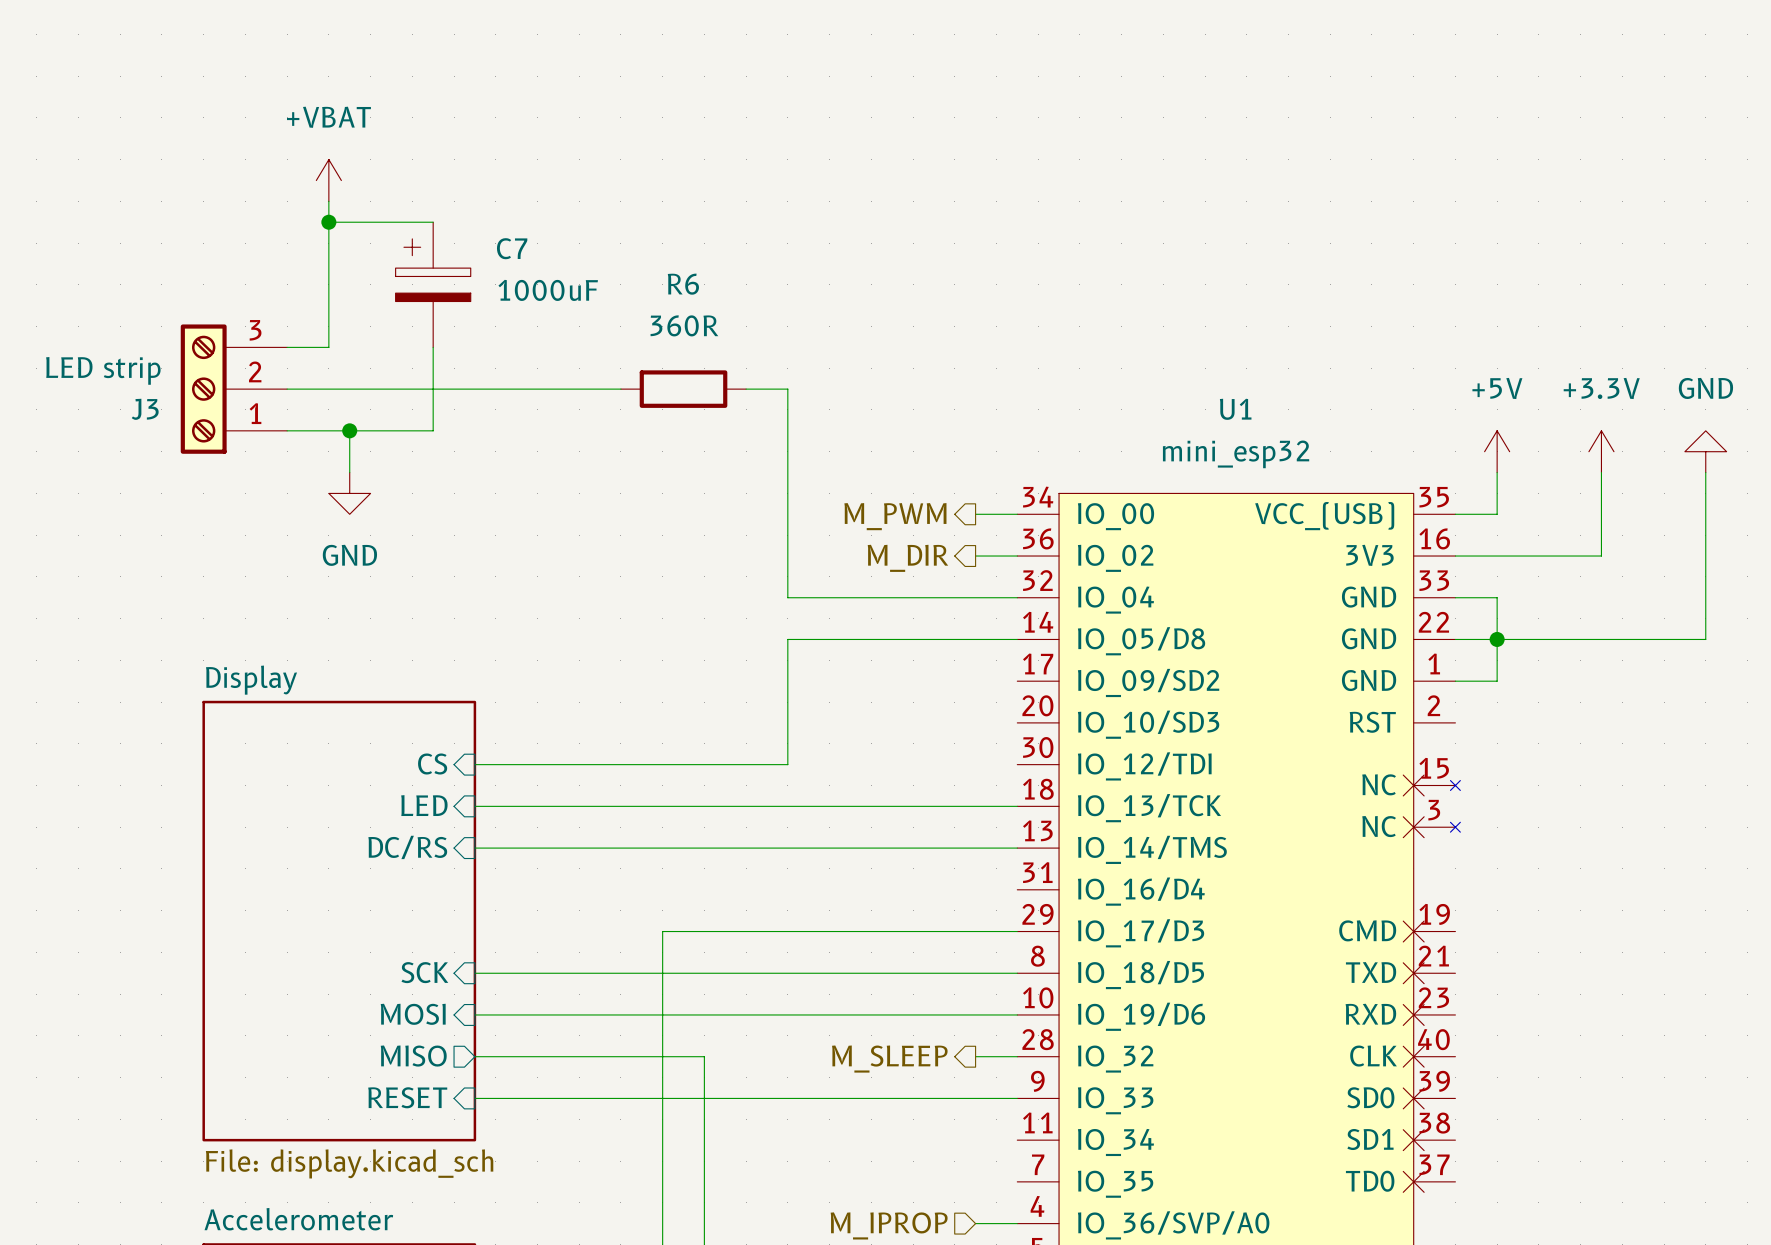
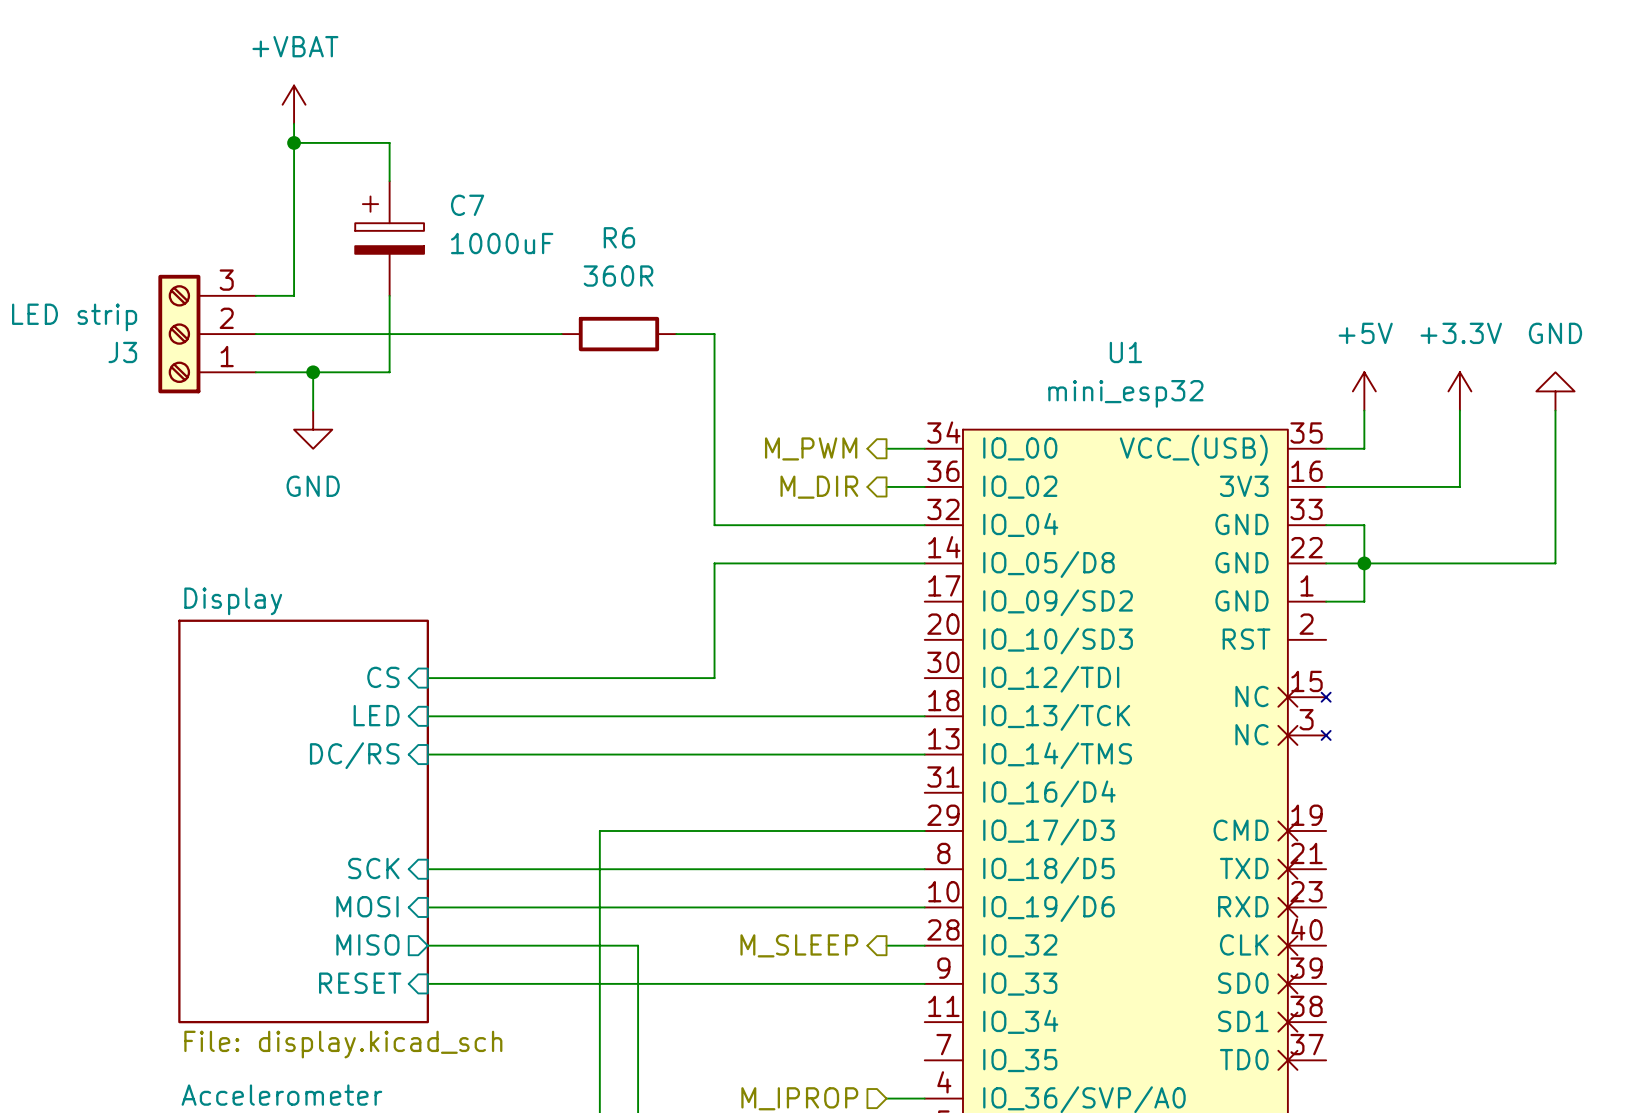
power symbol position: +VBAT (328, 180) -> +VBAT (294, 104)
wire: (328, 222) (433, 222) -> (294, 142) (389, 142) (389, 181)
junction position: (328, 222) -> (294, 142)

